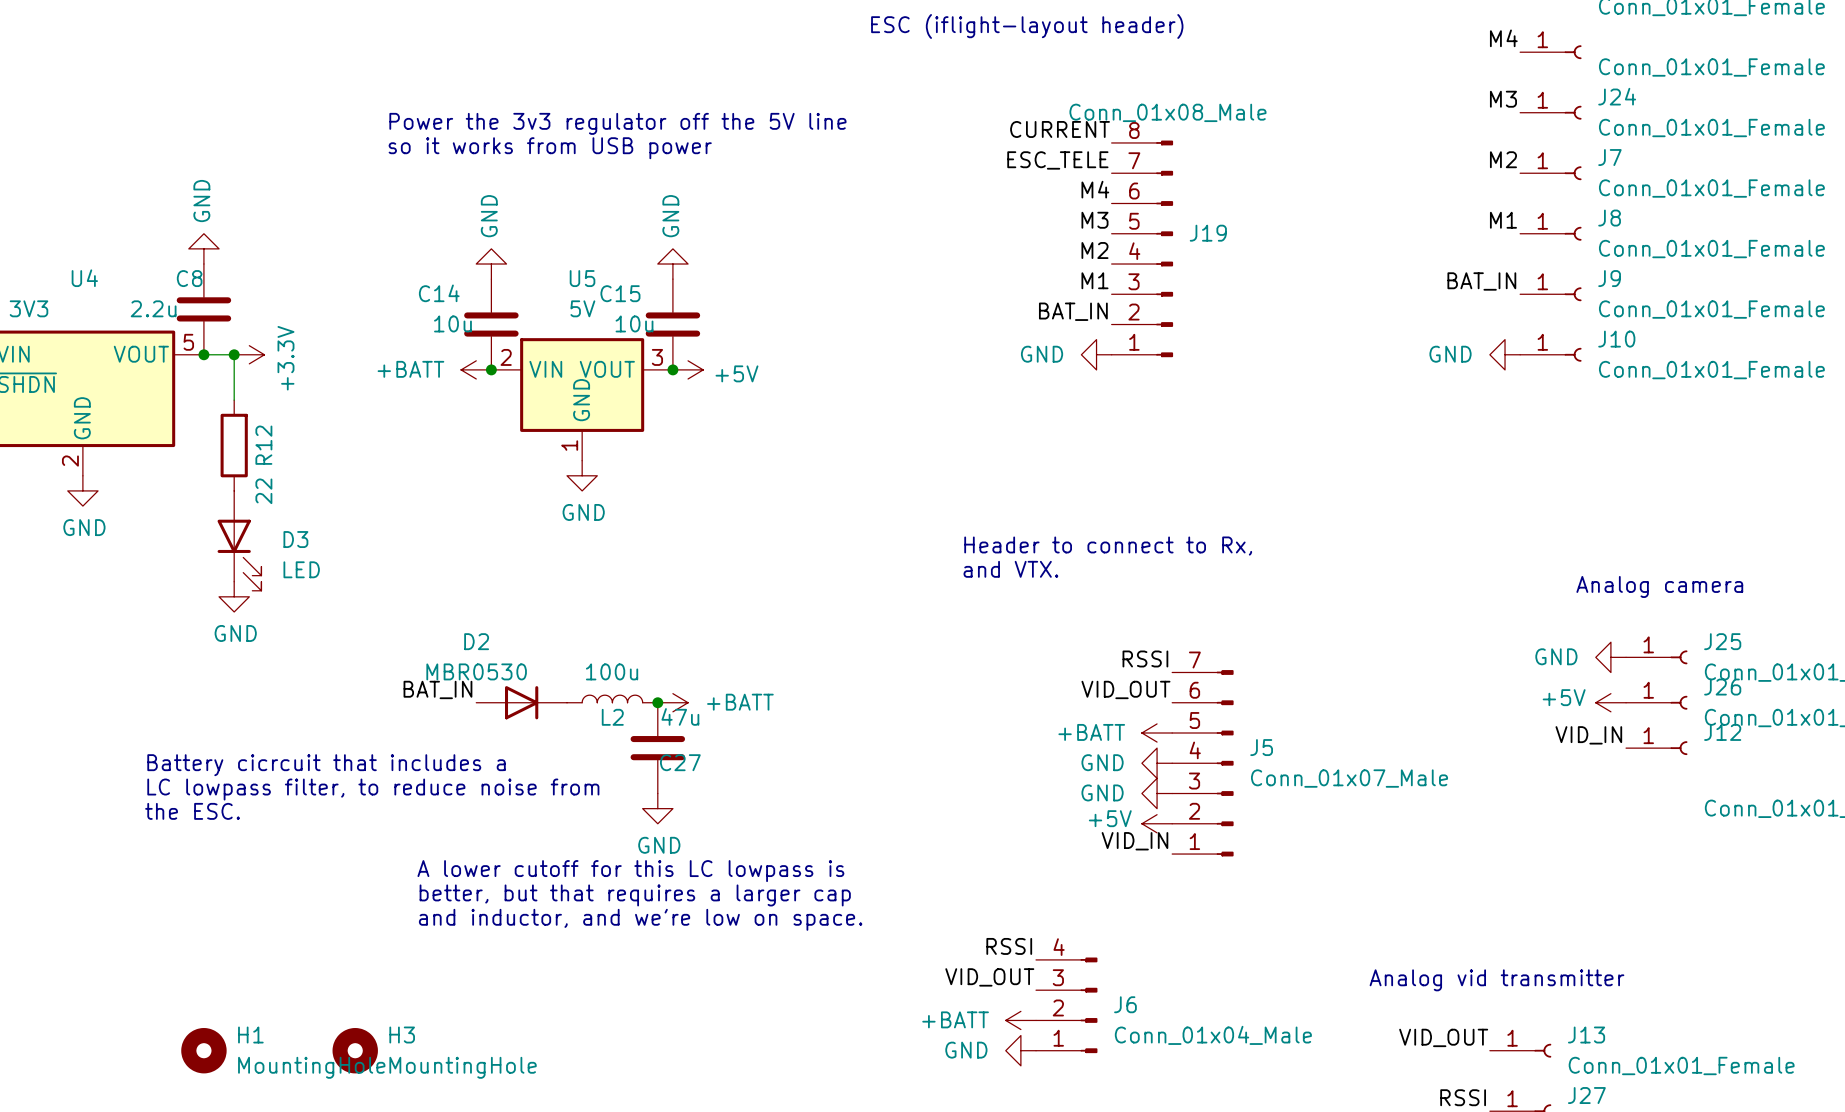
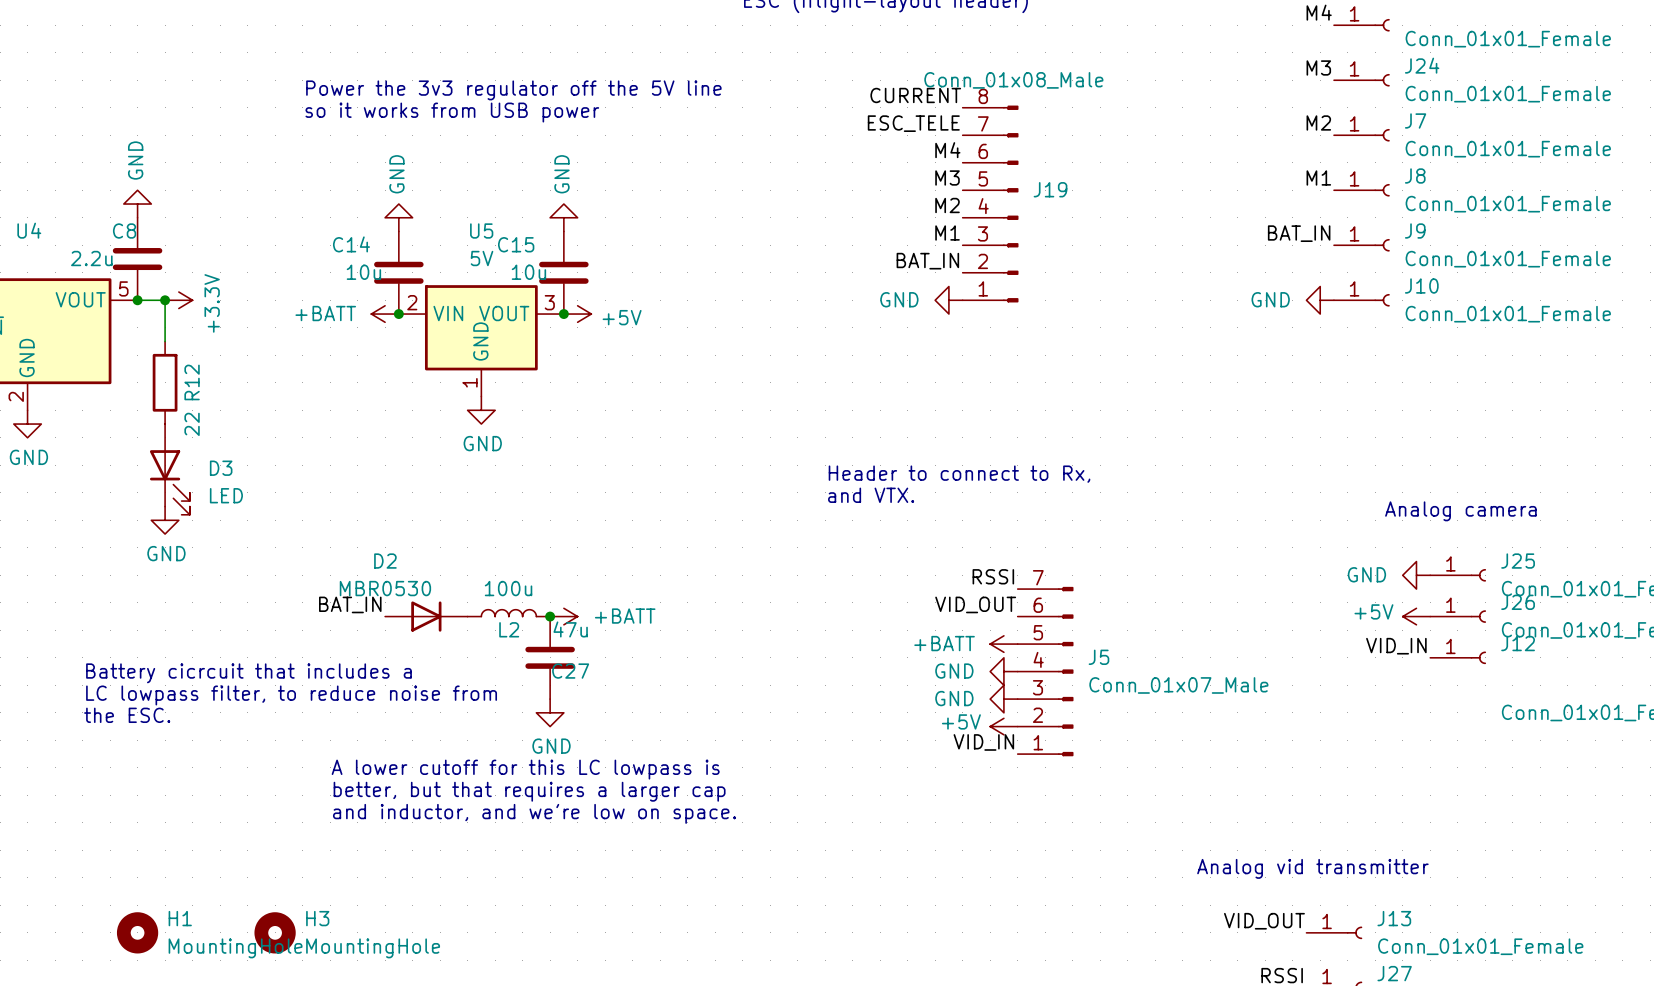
label: RSSI (1009, 946) -> none
label: VID_OUT (989, 977) -> none
J6: Conn_01x04_Male (1066, 1005) -> none
power symbol: +BATT (1020, 1020) -> none
power symbol: GND (1020, 1050) -> none

